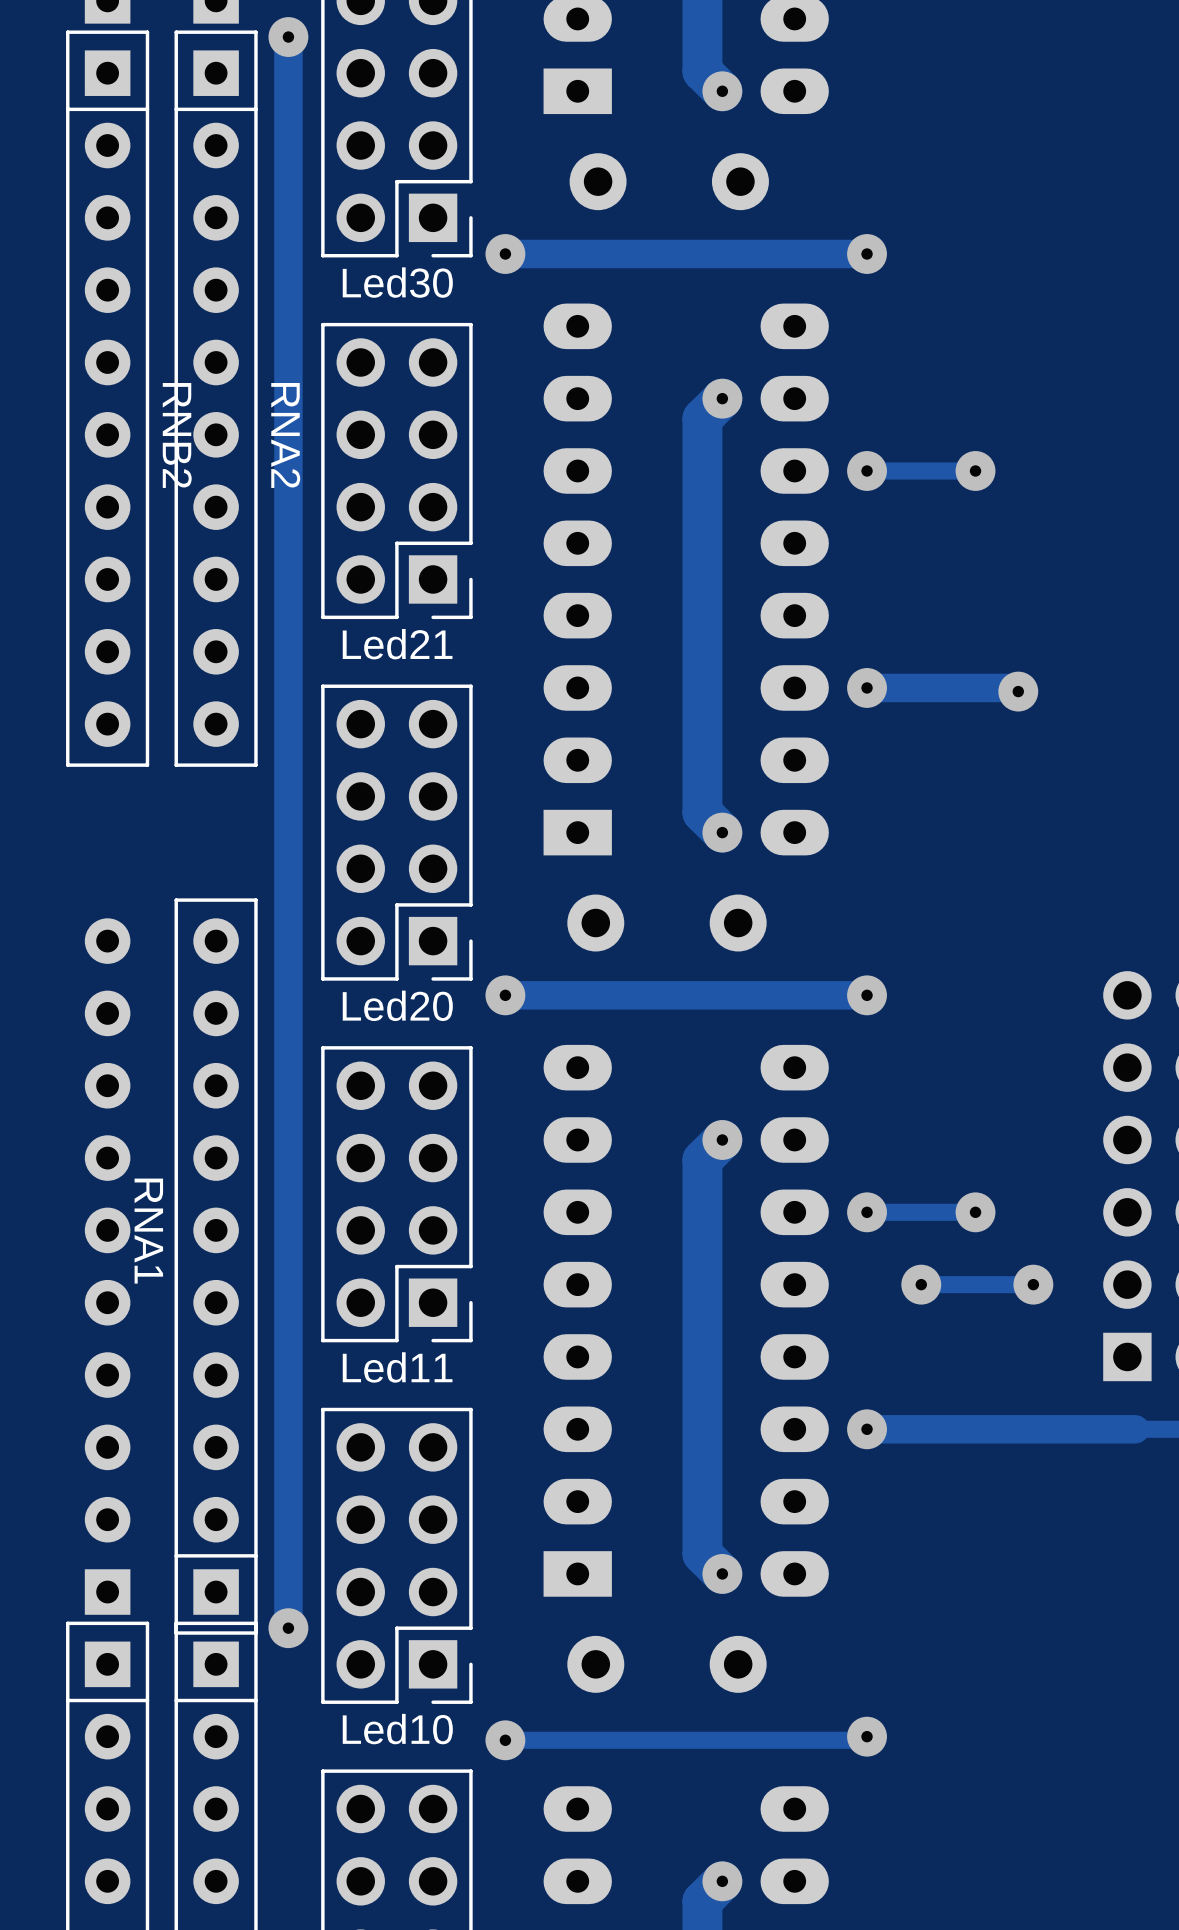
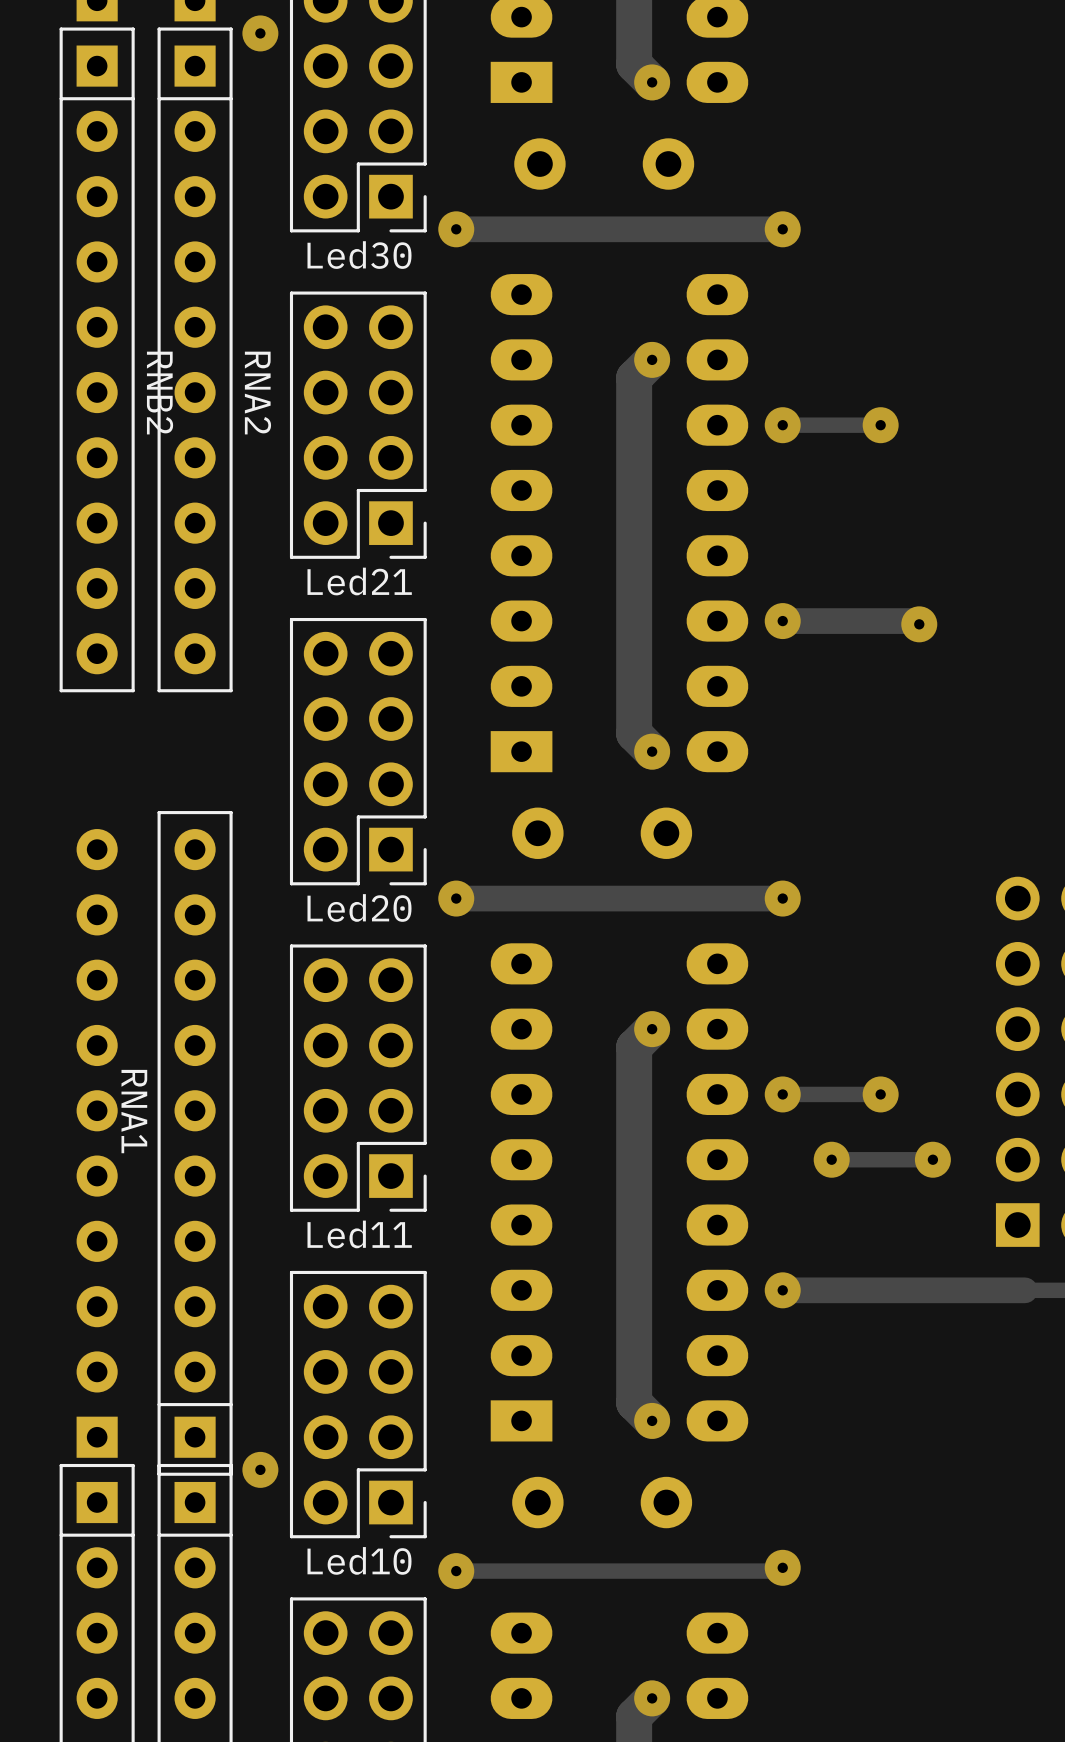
track: (288, 37) (288, 1628) -> none

